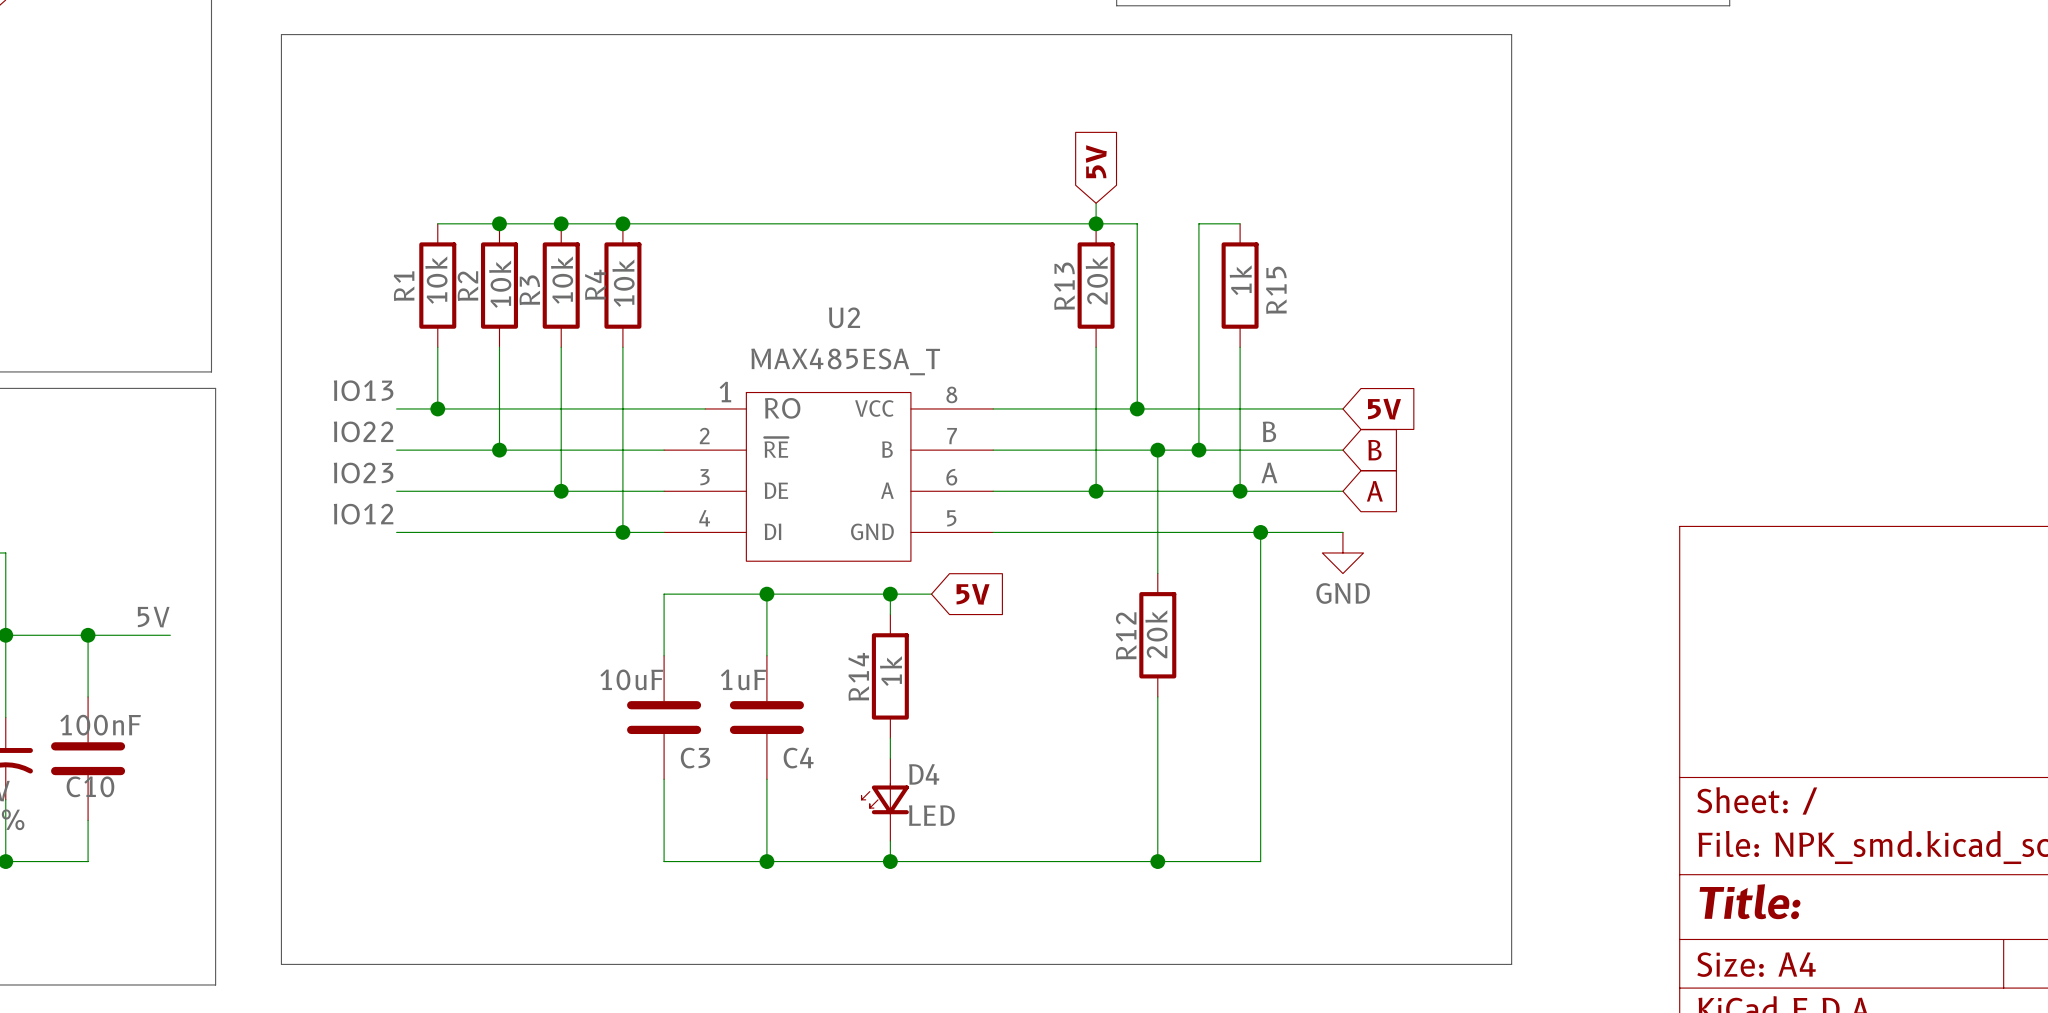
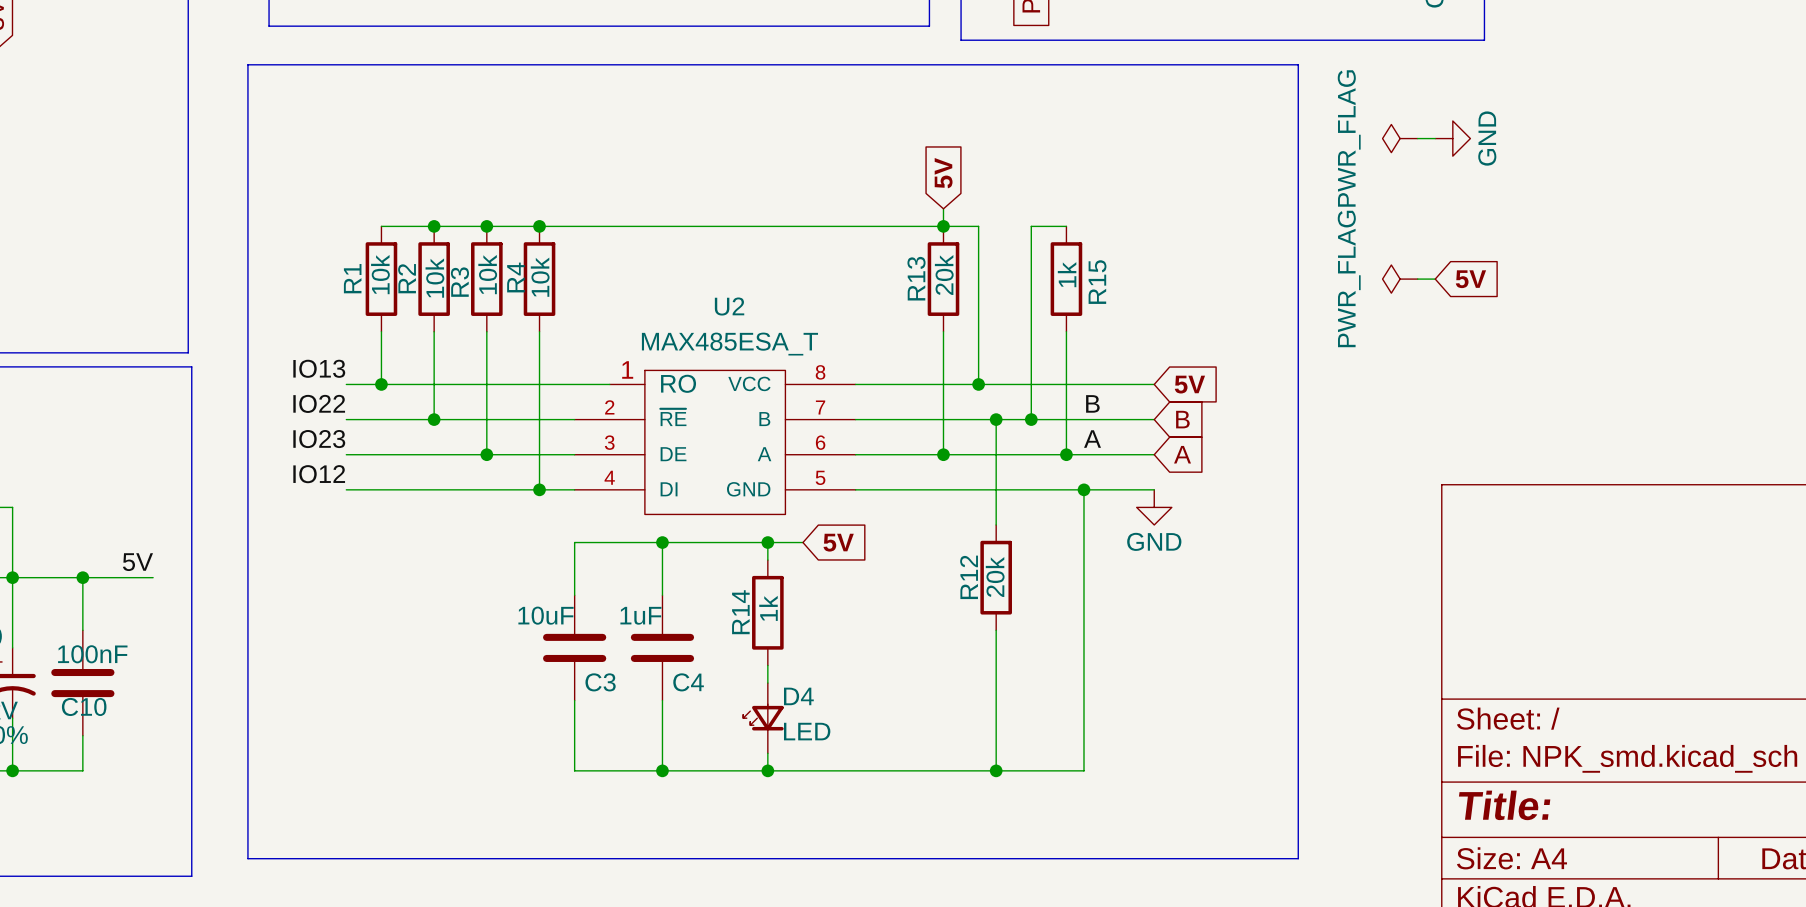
power symbol: none -> PWR_FLAG (1400, 138)
wire: none -> (1417, 138) (1435, 138)
power symbol: none -> GND (1452, 138)
power symbol: none -> PWR_FLAG (1400, 279)
wire: none -> (1417, 279) (1435, 279)
global label: none -> 5V (1470, 279)

